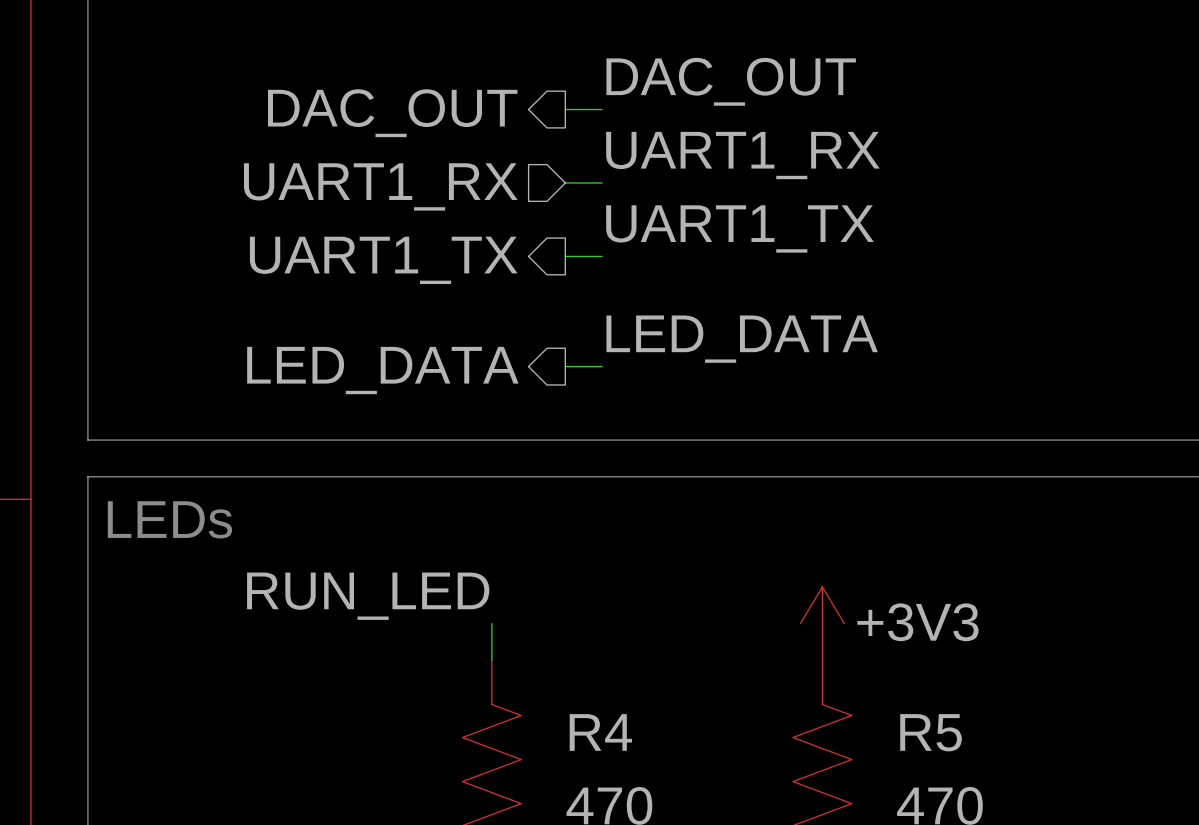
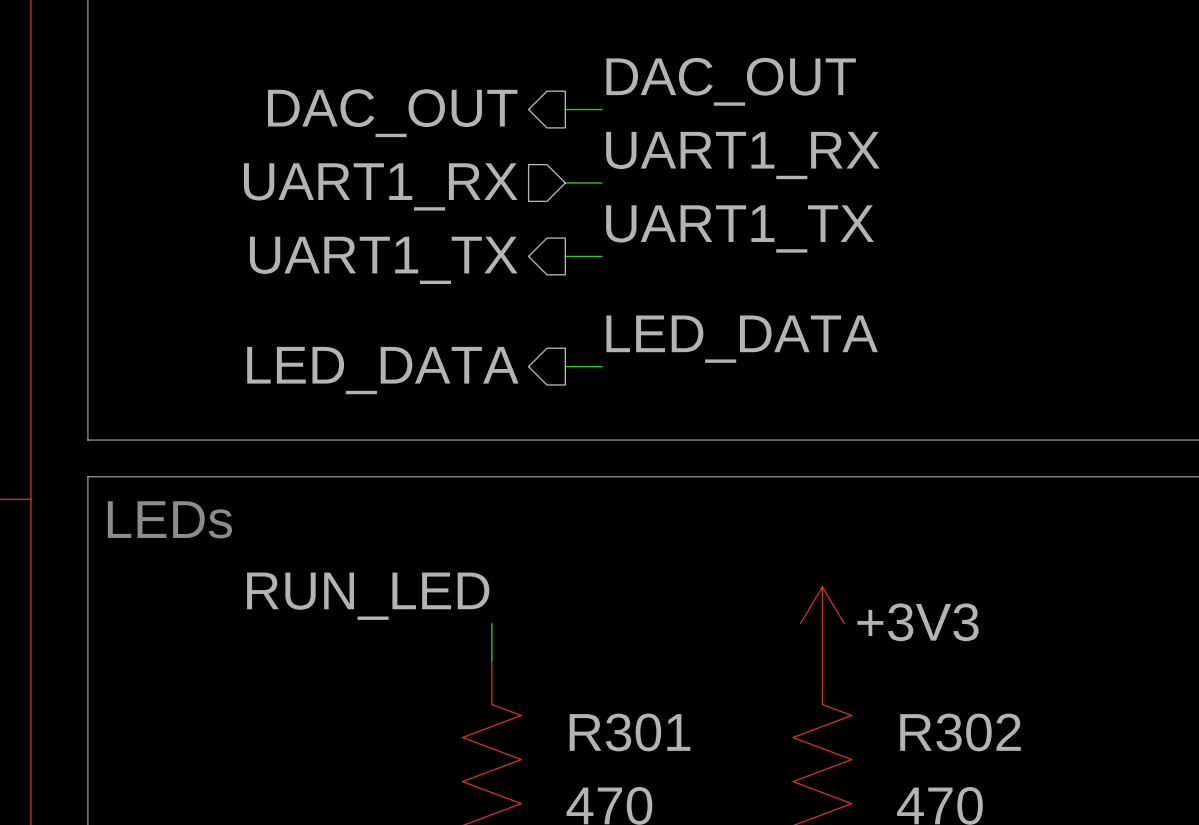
R4 name: R4 (600, 732) -> R301 (630, 732)
R5 name: R5 (931, 732) -> R302 (960, 732)

